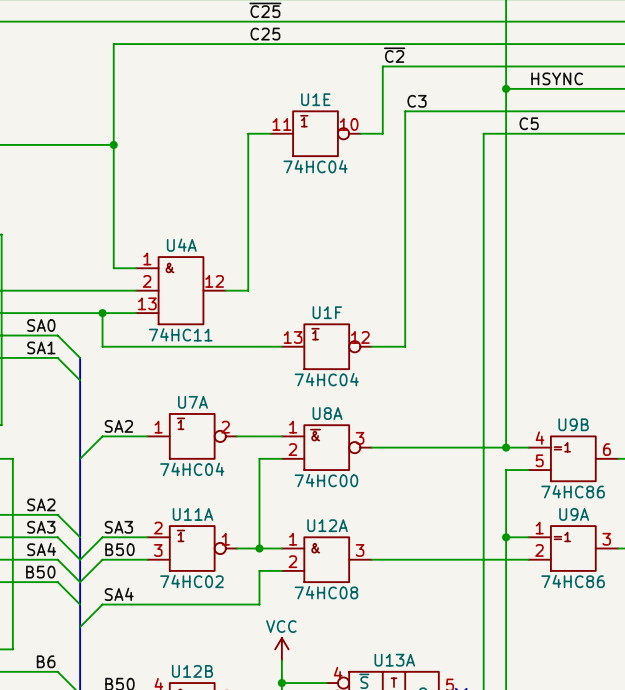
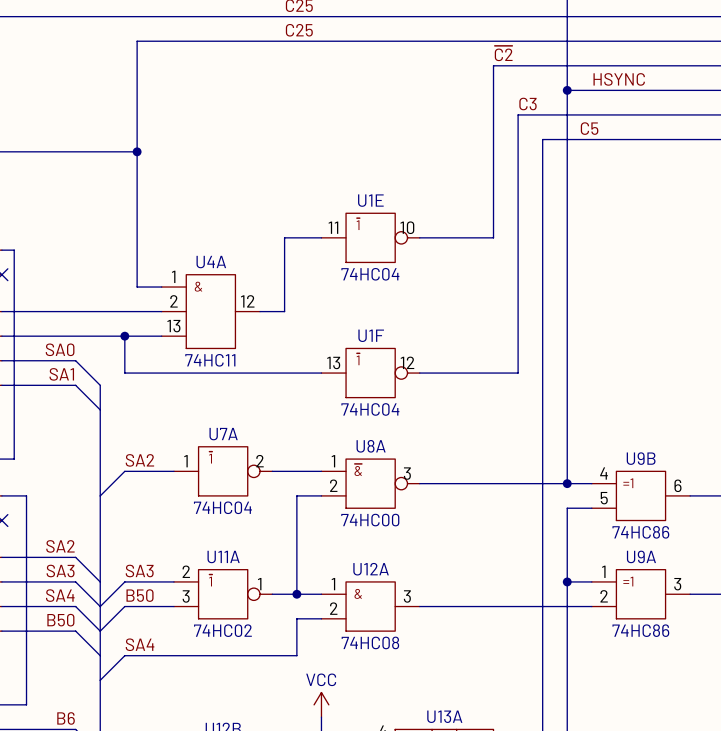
label position: ~{C2} (394, 55) -> ~{C2} (503, 53)
wire: (438, 66) (382, 66) (382, 133) (360, 133) -> (493, 65) (493, 237) (419, 237)
label position: C3 (417, 101) -> C3 (528, 104)
wire: (461, 111) (405, 111) (405, 346) -> (518, 114) (518, 373) (456, 373)
wire: (270, 133) (248, 133) (248, 223) -> (321, 237) (284, 237)
U1E position: (315, 133) -> (370, 237)

